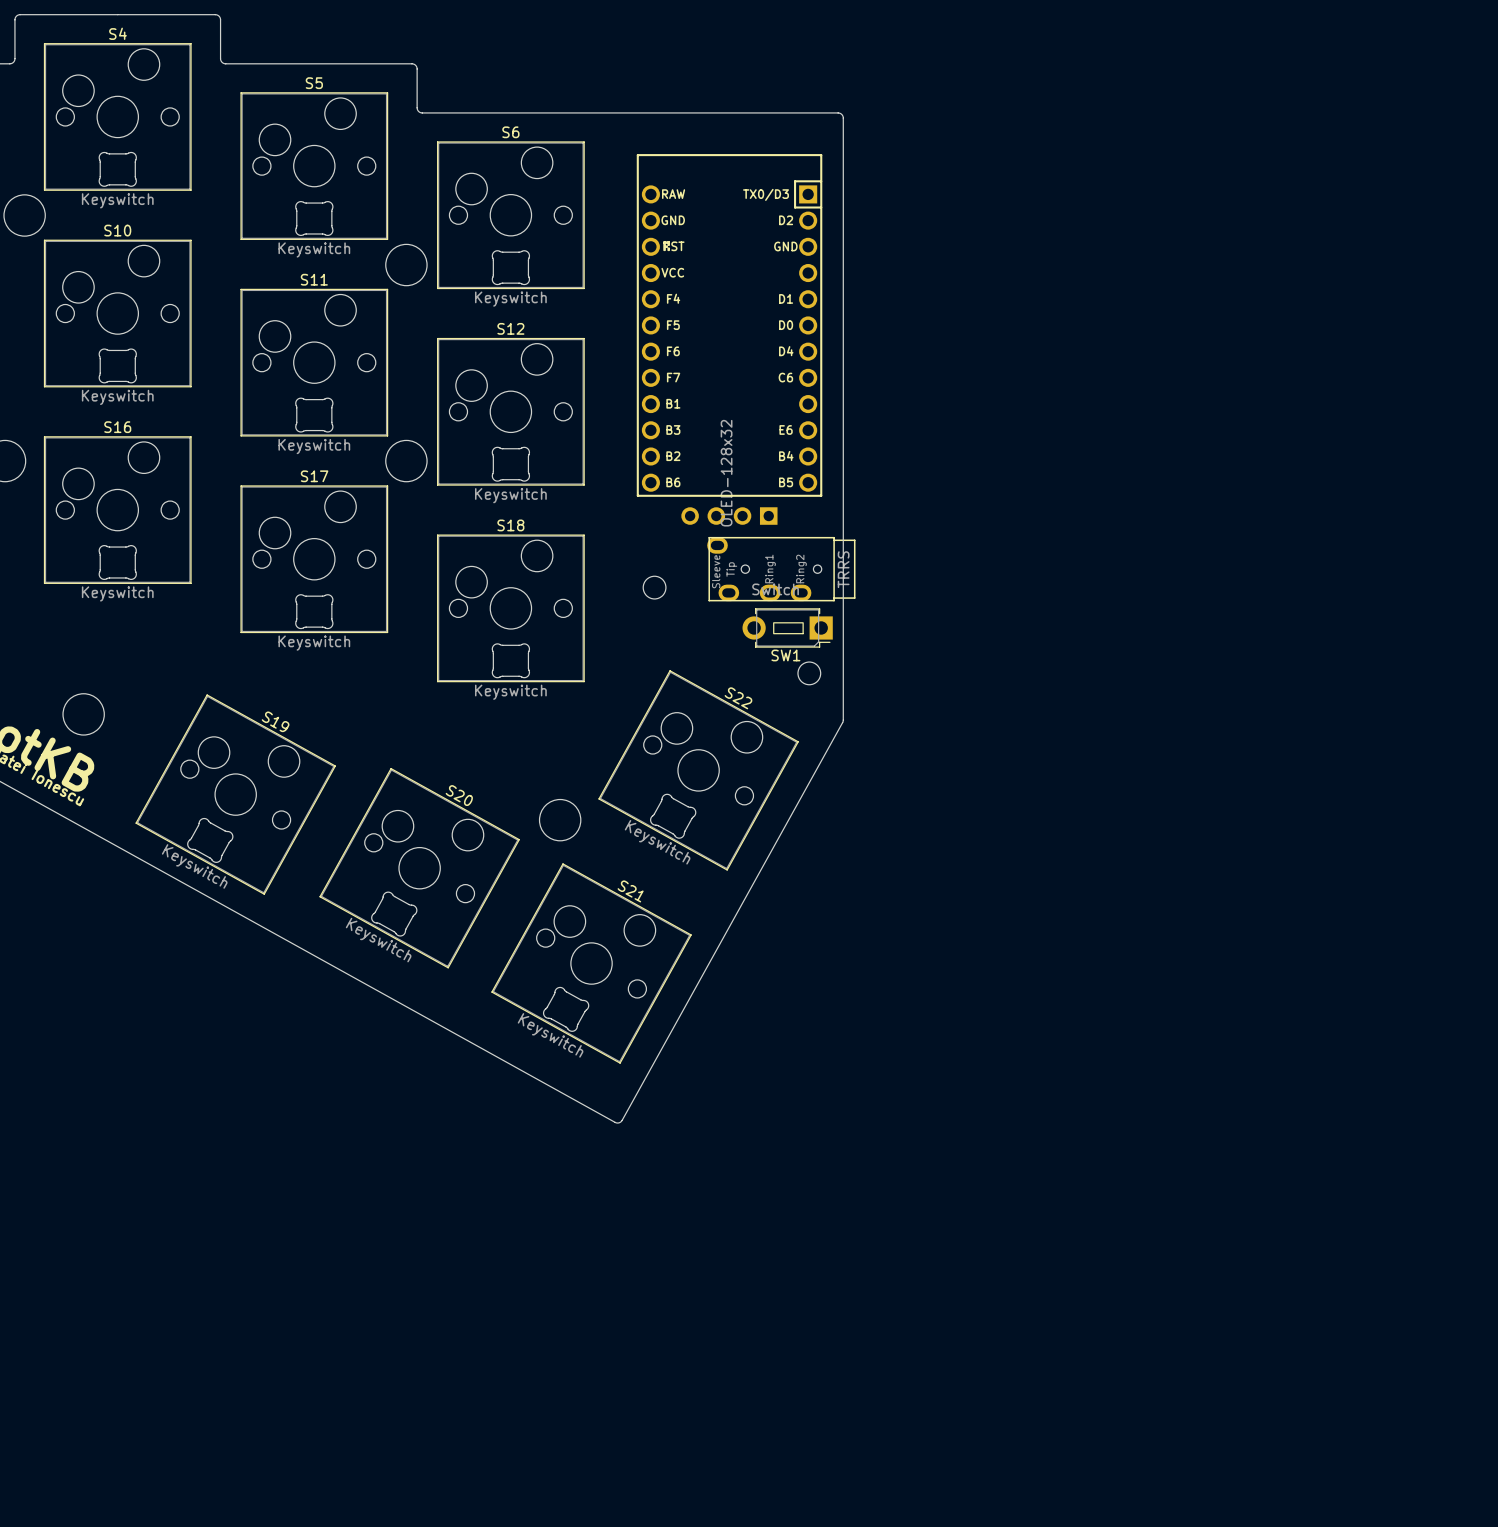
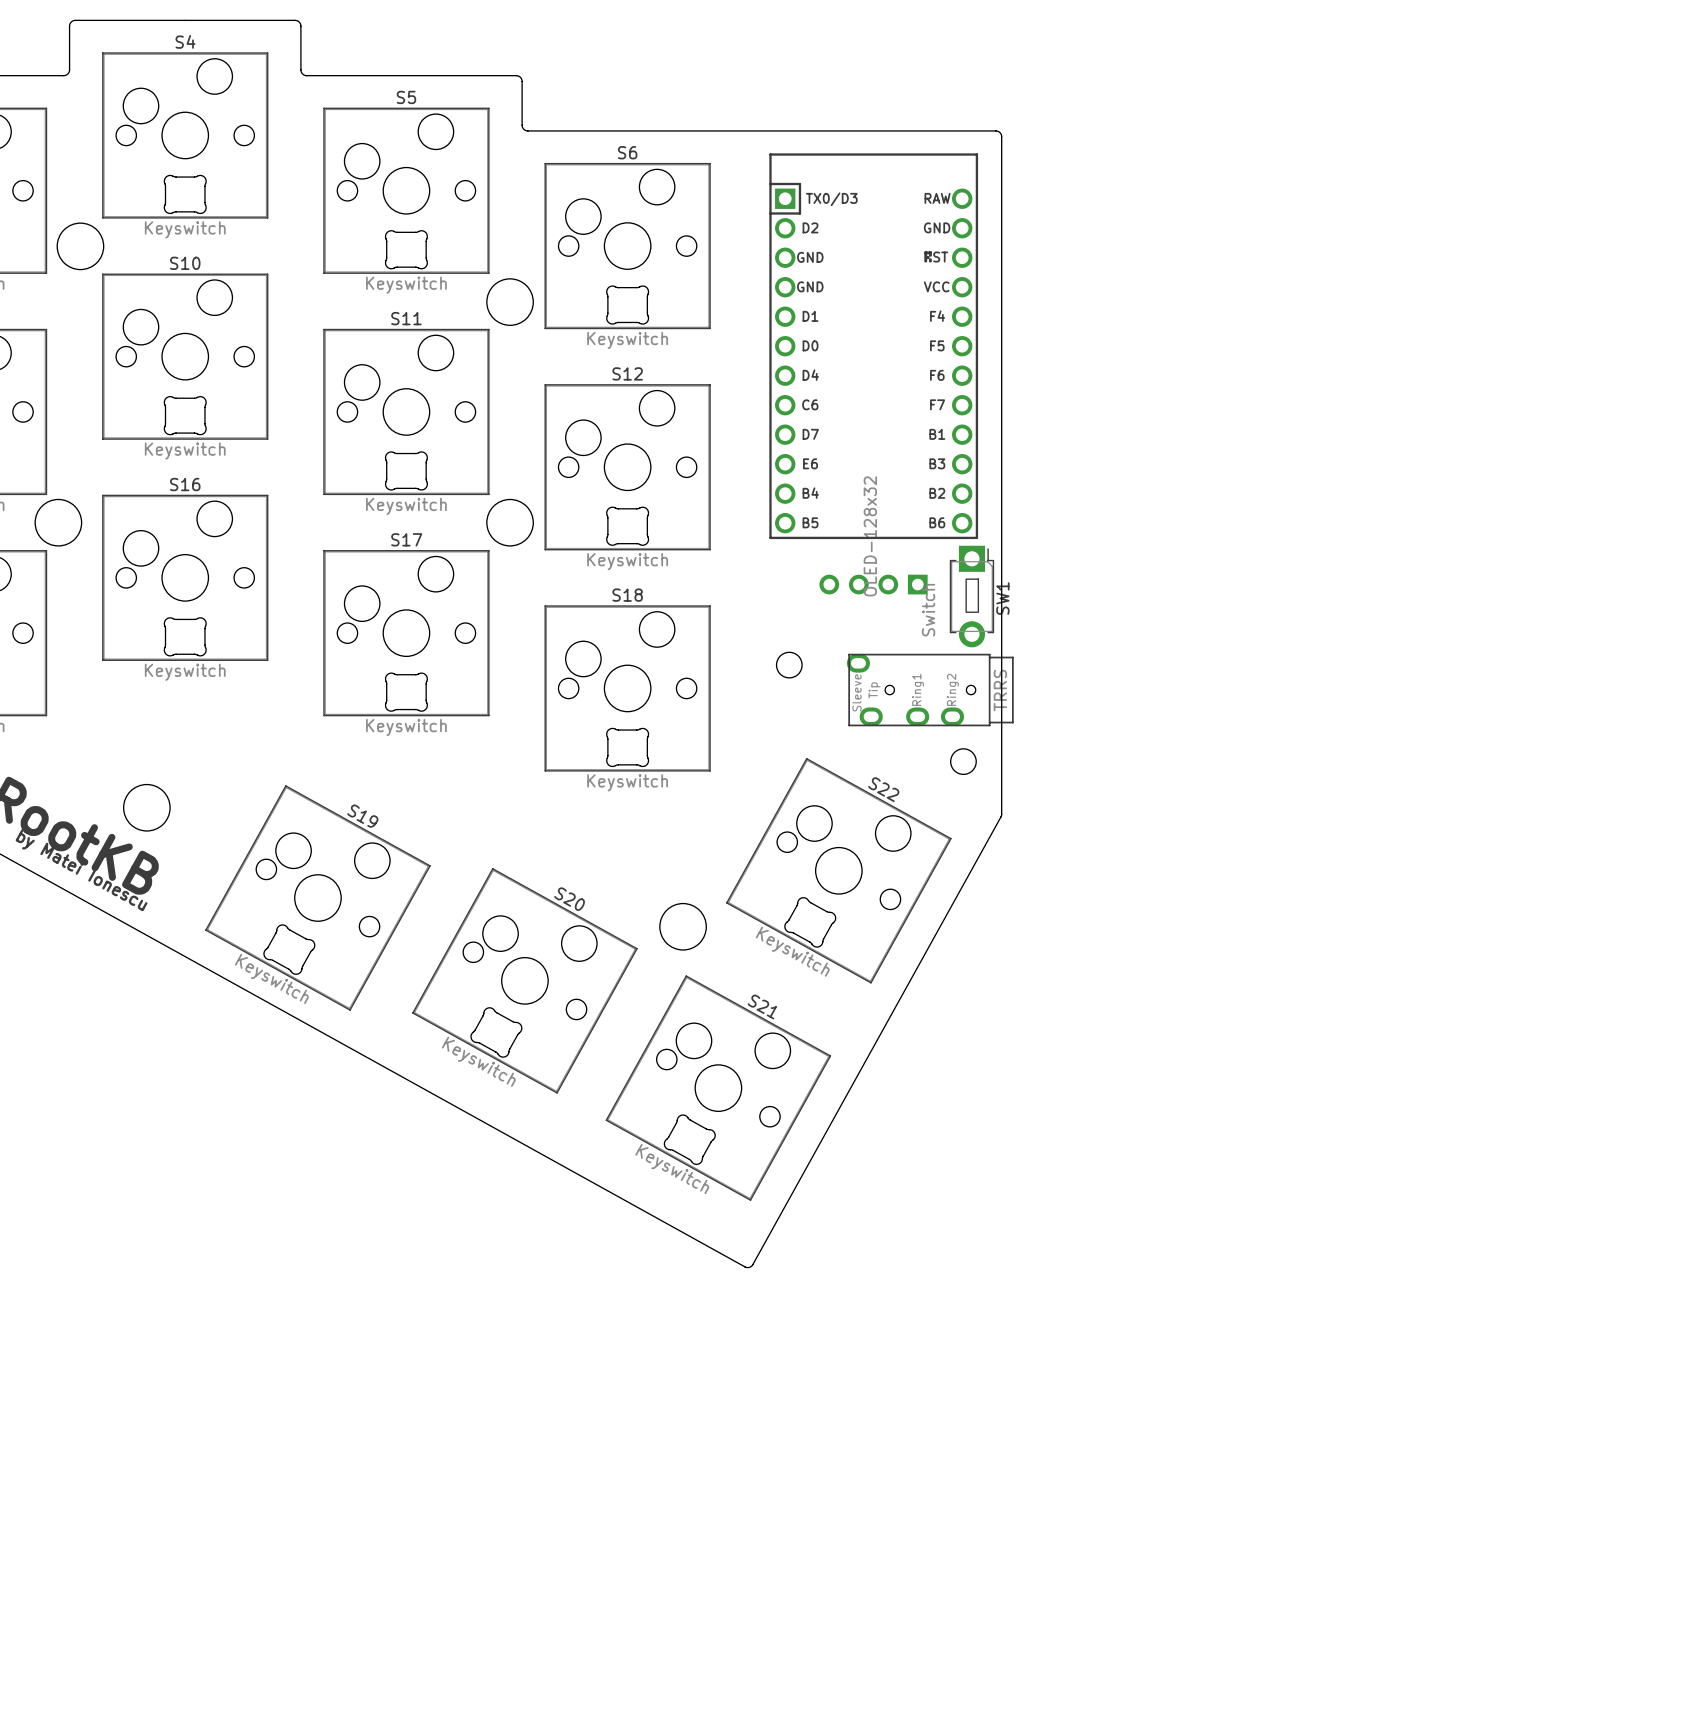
part side: bottom (729, 325) -> top (873, 346)
part position: (781, 569) -> (930, 690)
SW1 rotation: 0° (787, 627) -> 90° counterclockwise (971, 596)
SW1 position: (787, 627) -> (971, 596)

